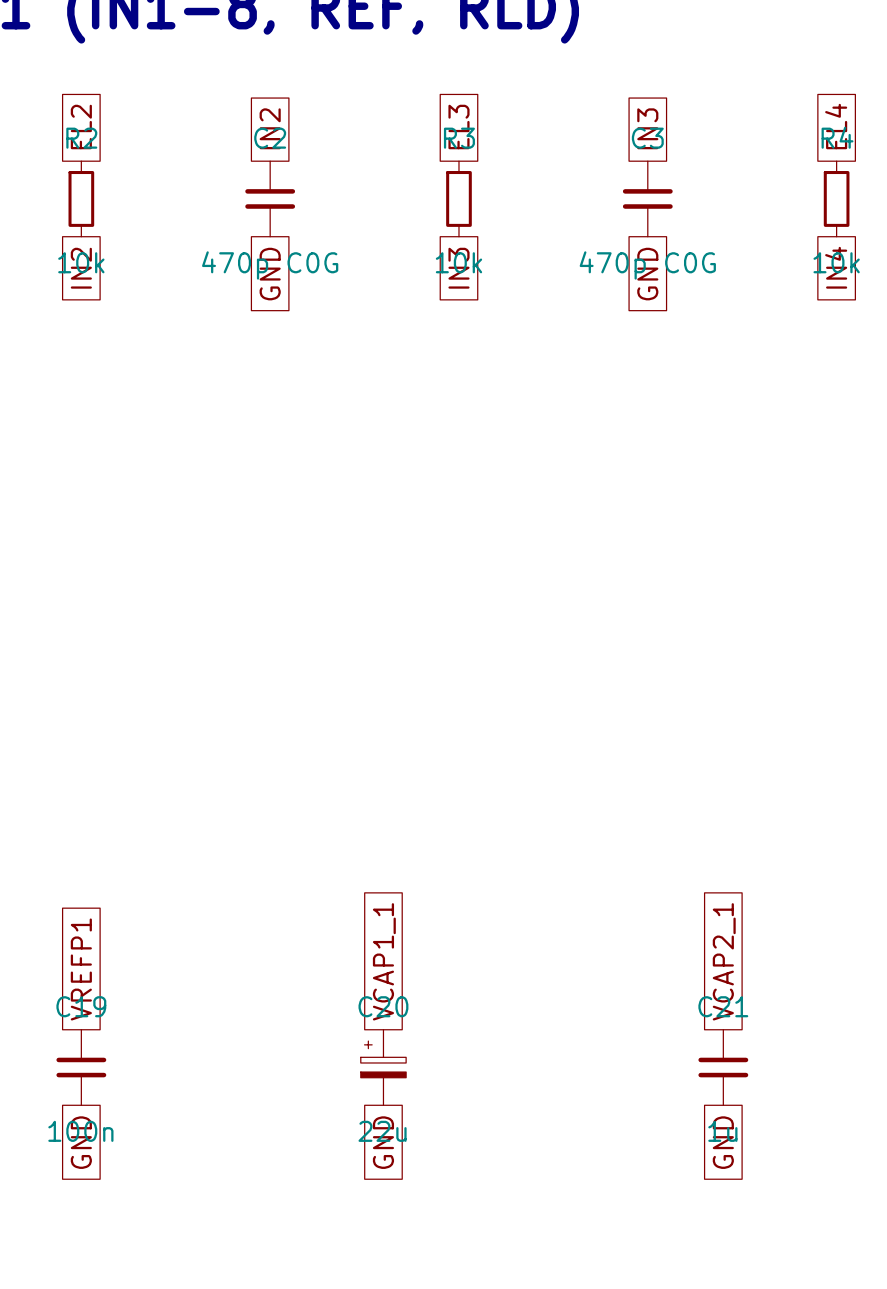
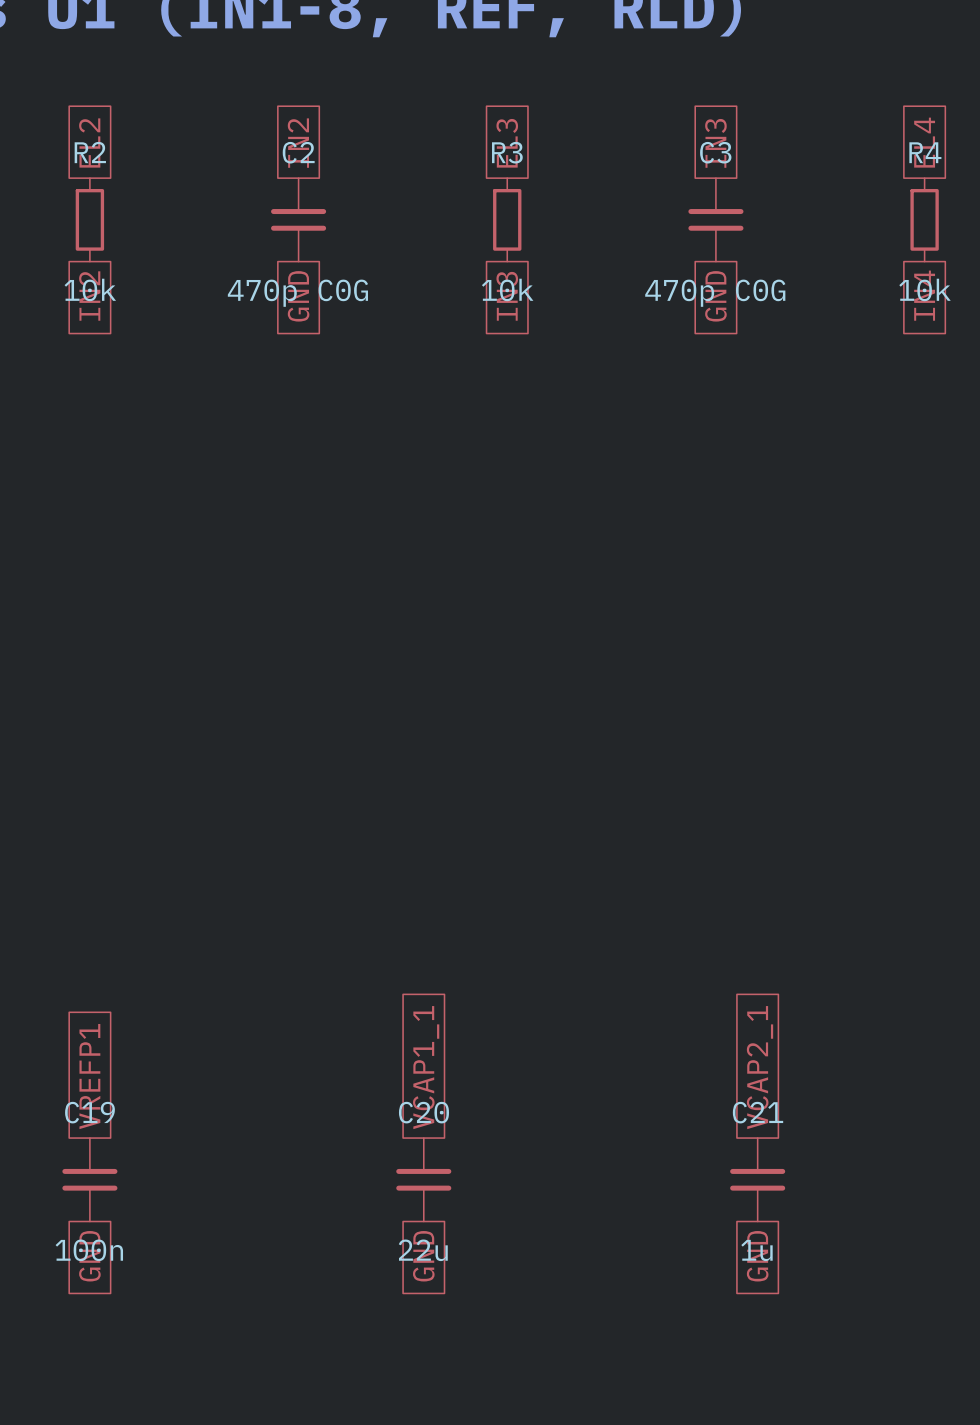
global label position: VCAP2_1 (724, 961) -> VCAP2_1 (760, 1067)
C20 symbol: [360, 1029, 407, 1106] -> [396, 1138, 452, 1222]
C21 position: (723, 1067) -> (757, 1179)
global label position: GND (723, 1142) -> GND (757, 1256)

